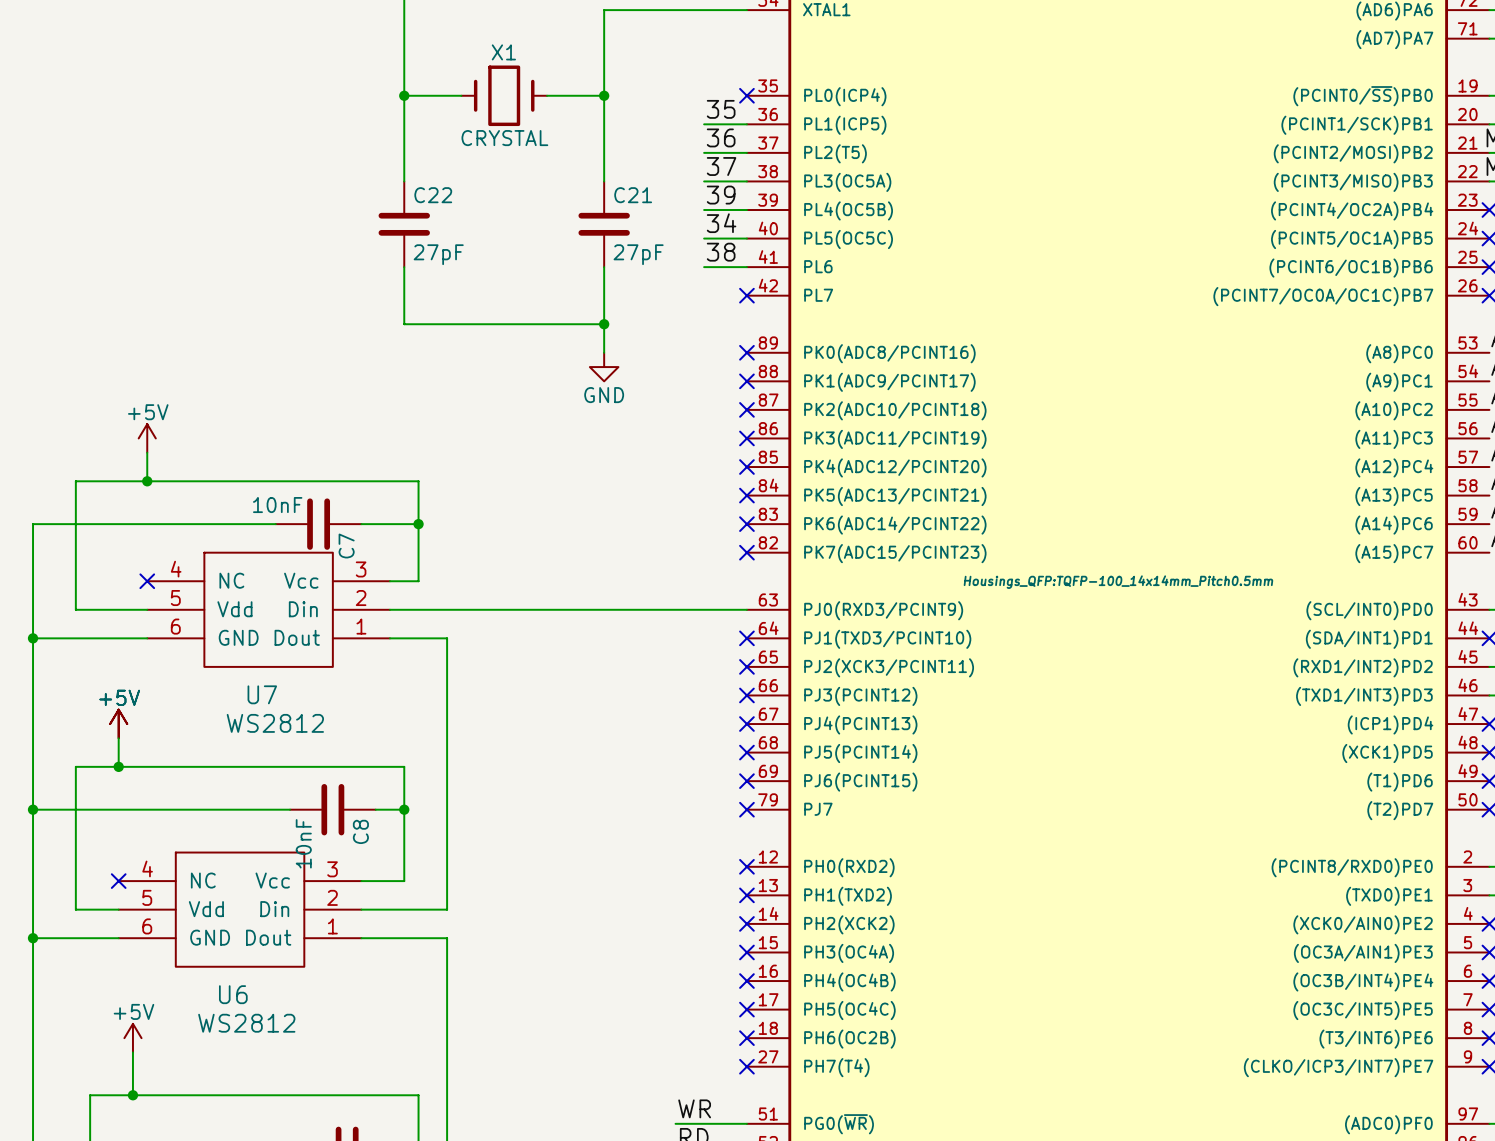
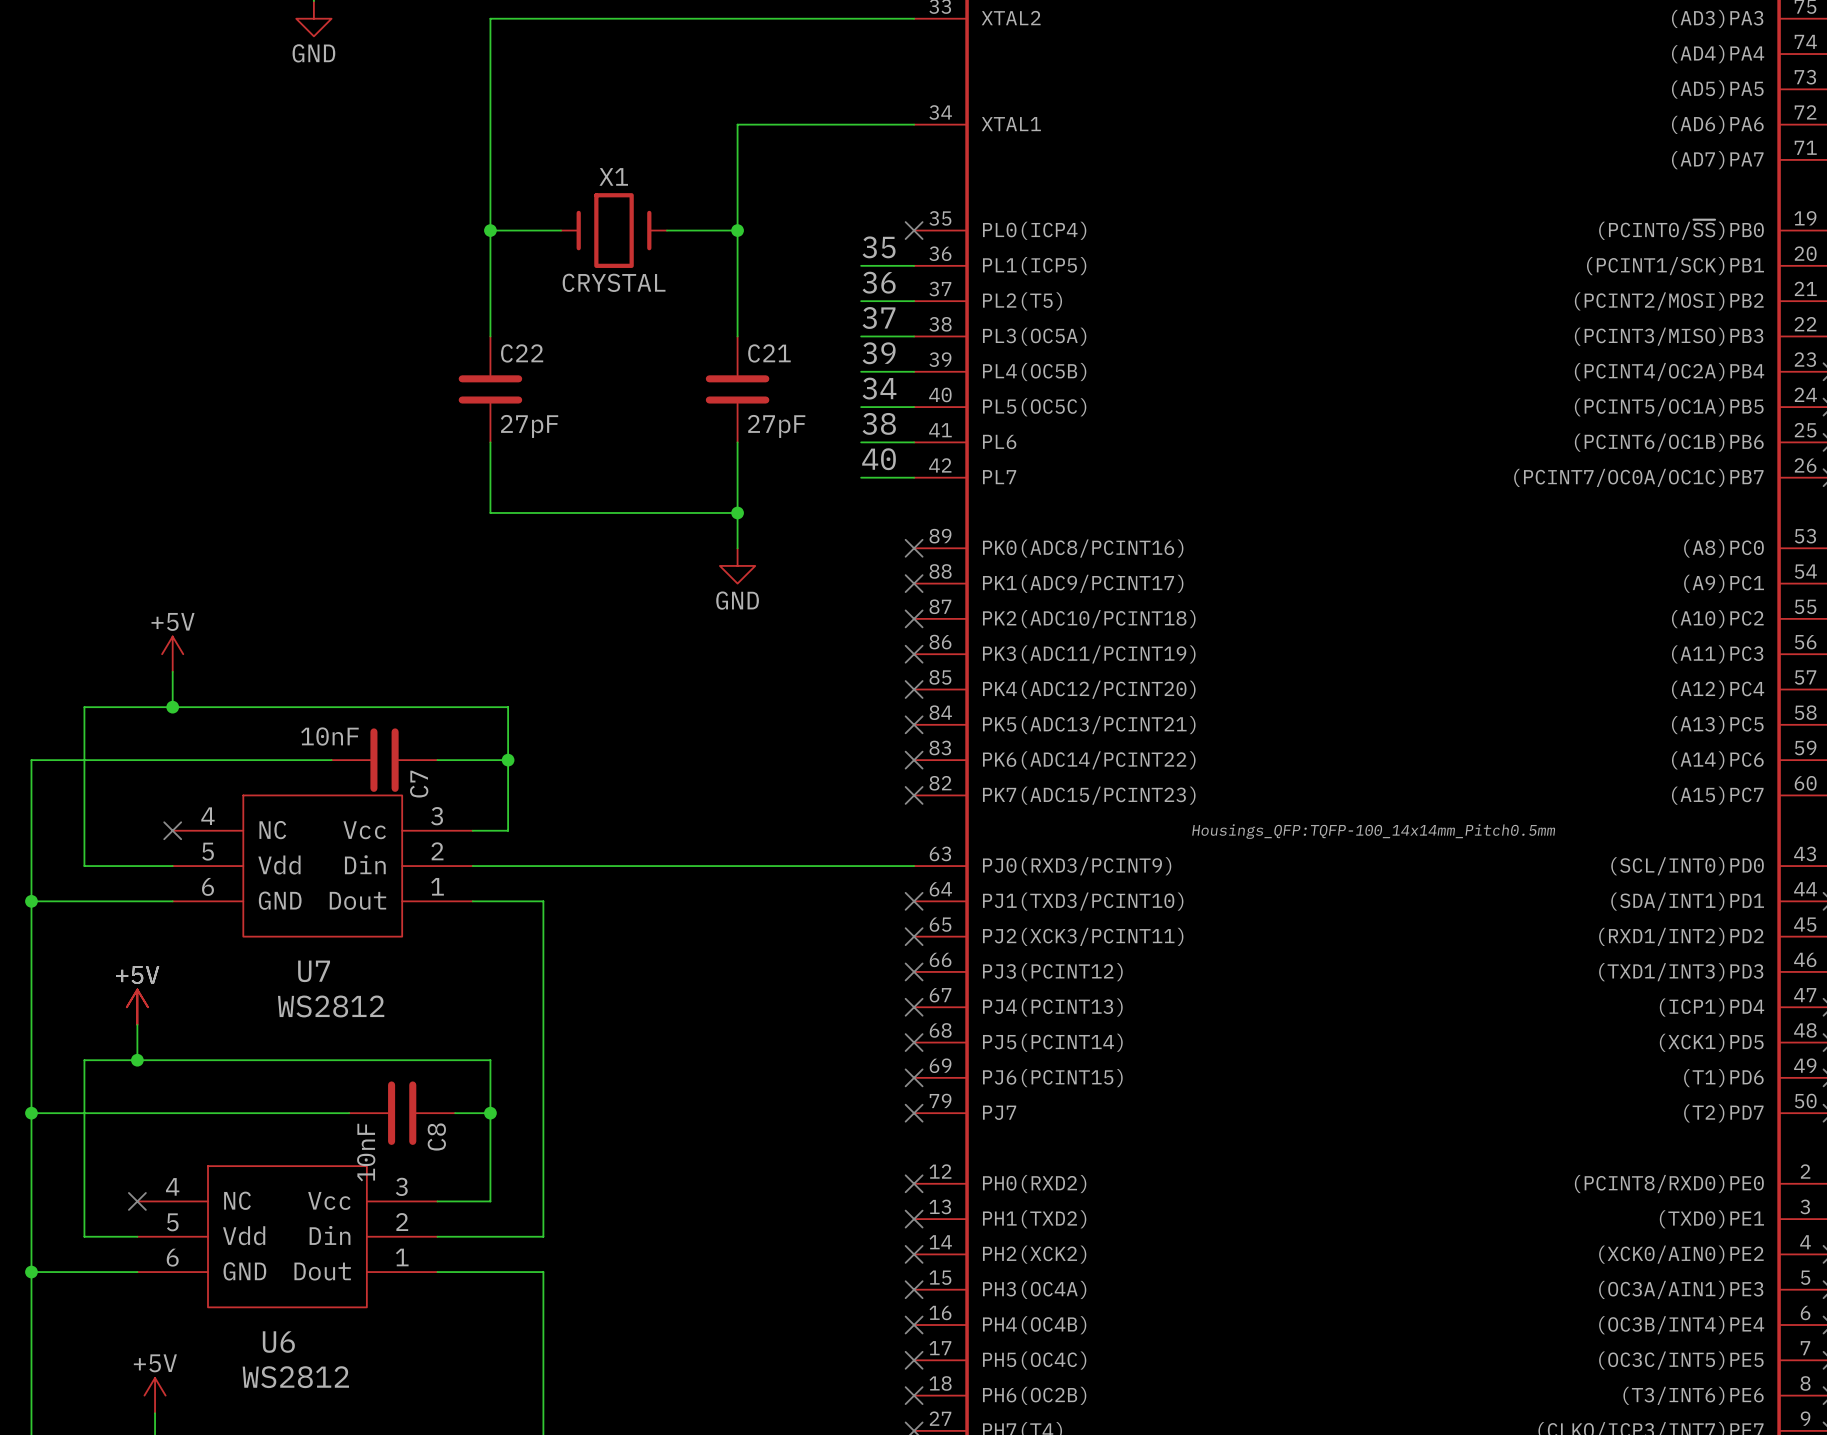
label: none -> 40 (879, 459)
wire: none -> (861, 477) (914, 477)
no-connect mark: (746, 295) -> none

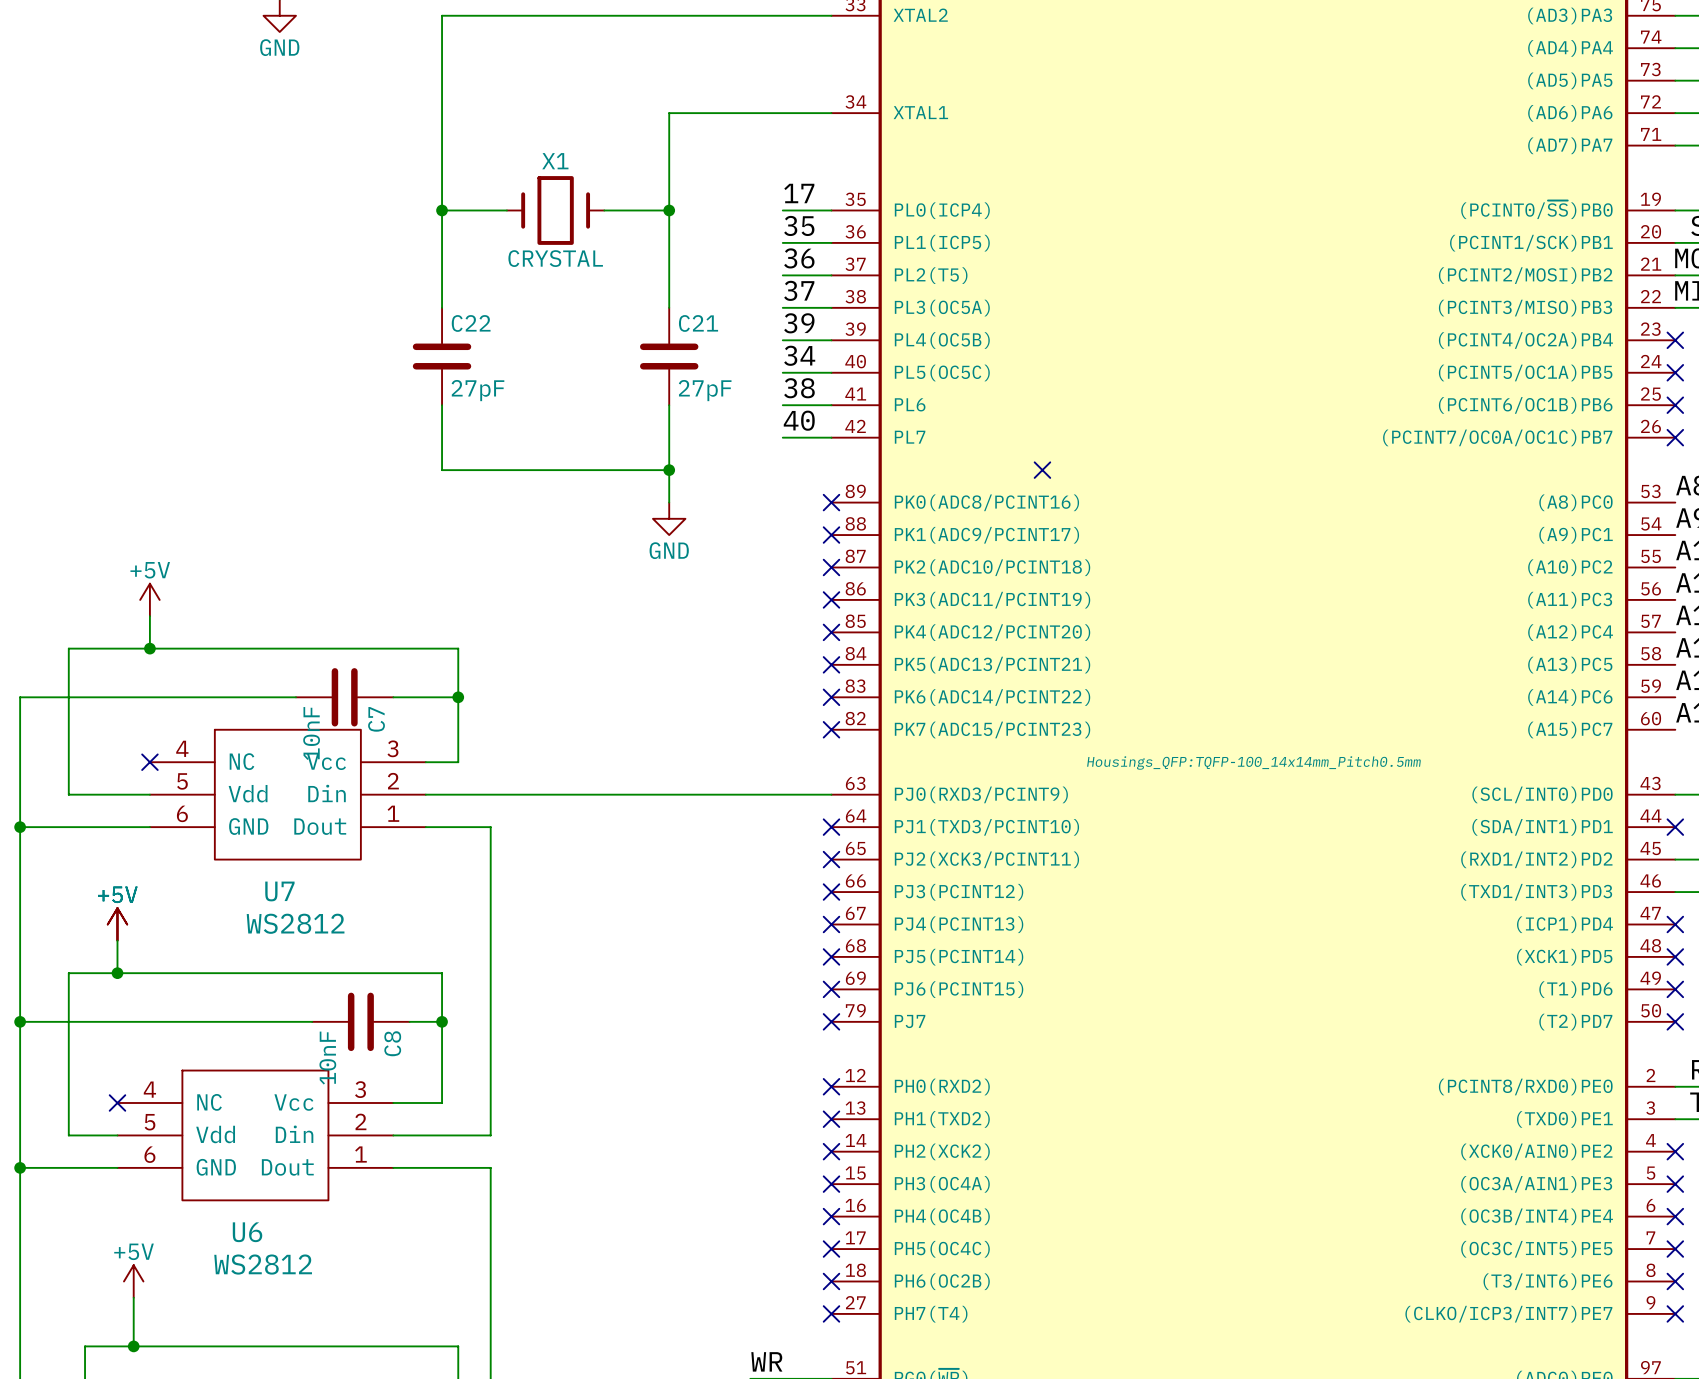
label: none -> 17 (799, 193)
wire: none -> (782, 210) (831, 210)
no-connect mark: (914, 230) -> none
no-connect mark: none -> (1042, 470)
C7 value rotation: 0° (329, 736) -> 90° counterclockwise (311, 733)

